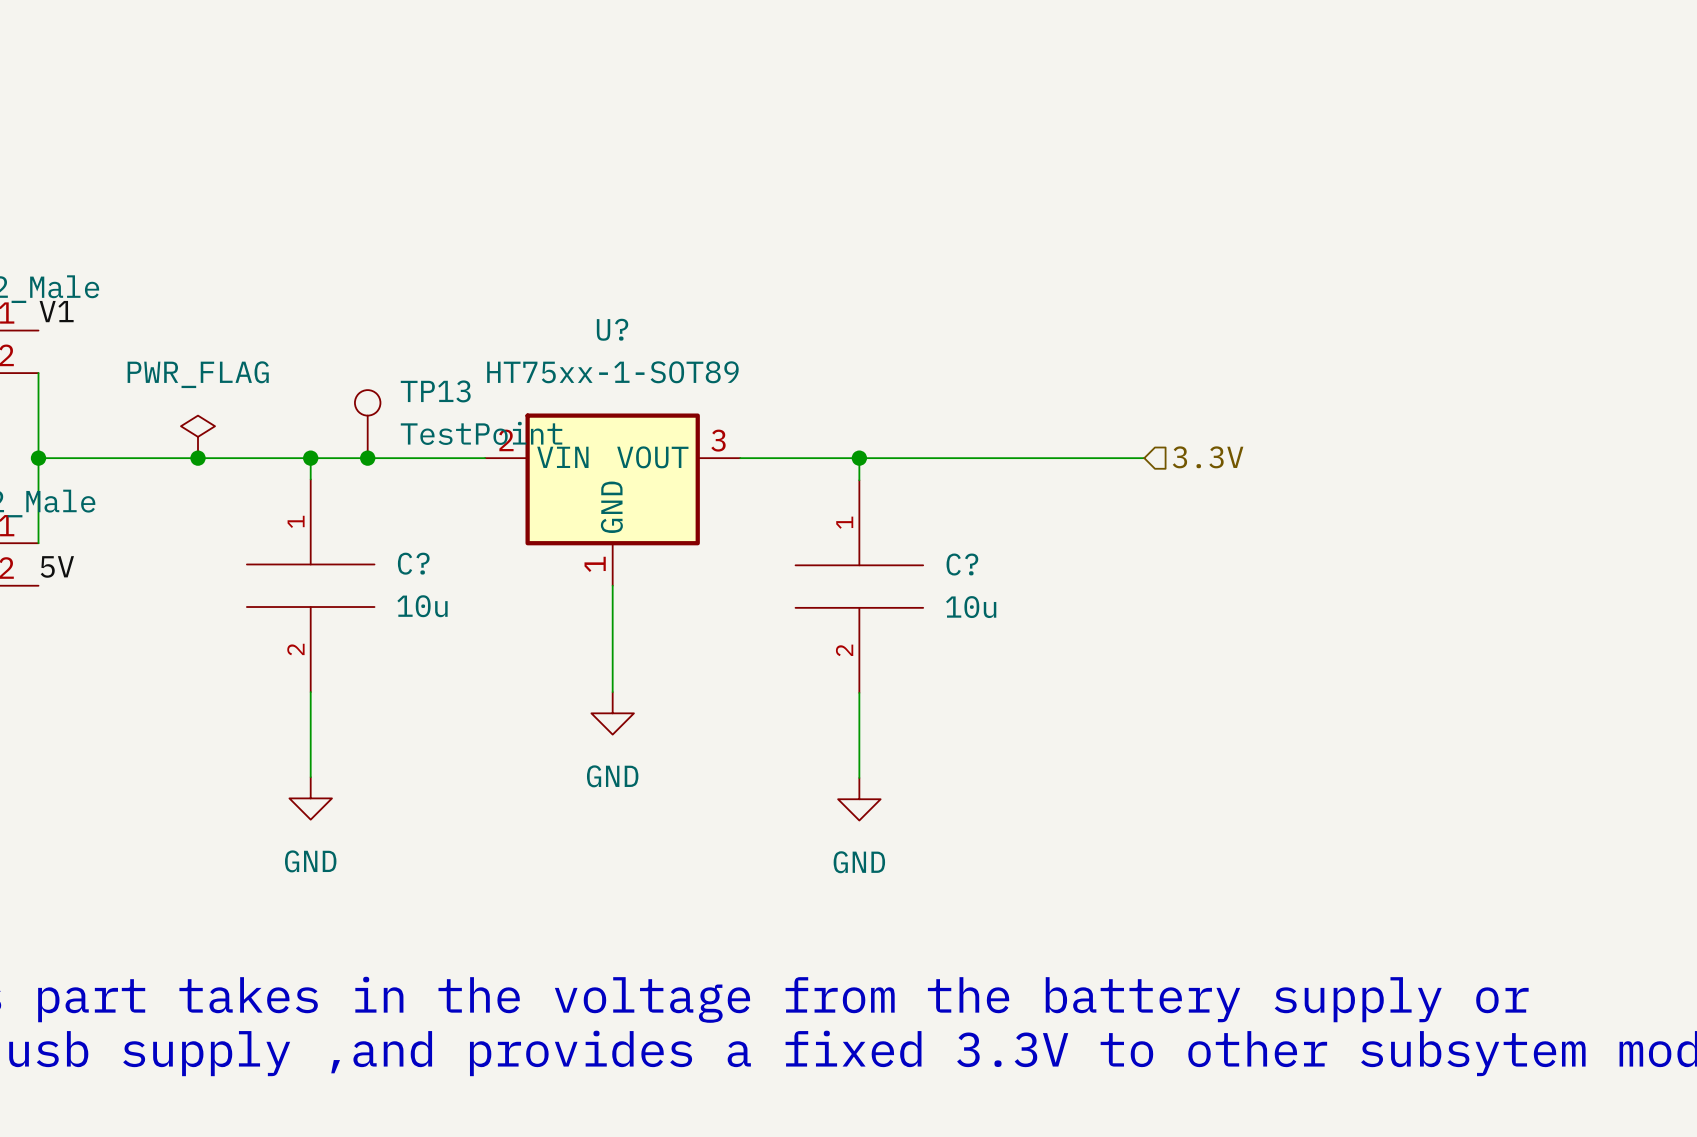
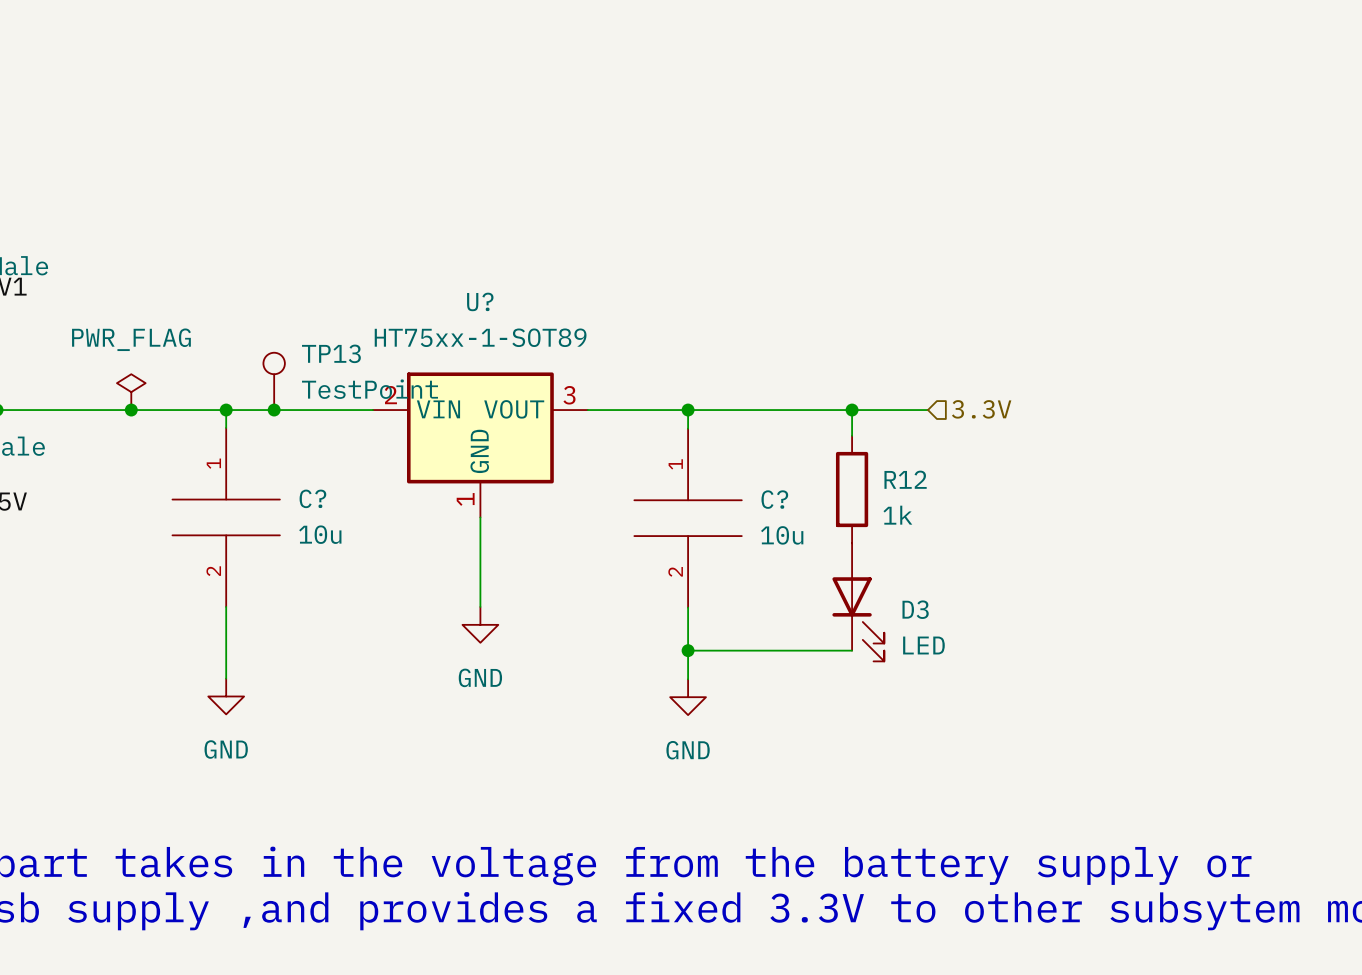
wire: none -> (852, 410) (852, 435)
junction: none -> (852, 410)
R12: none -> 1k (852, 489)
D3: none -> LED (858, 602)
wire: none -> (688, 650) (852, 650)
junction: none -> (688, 650)

